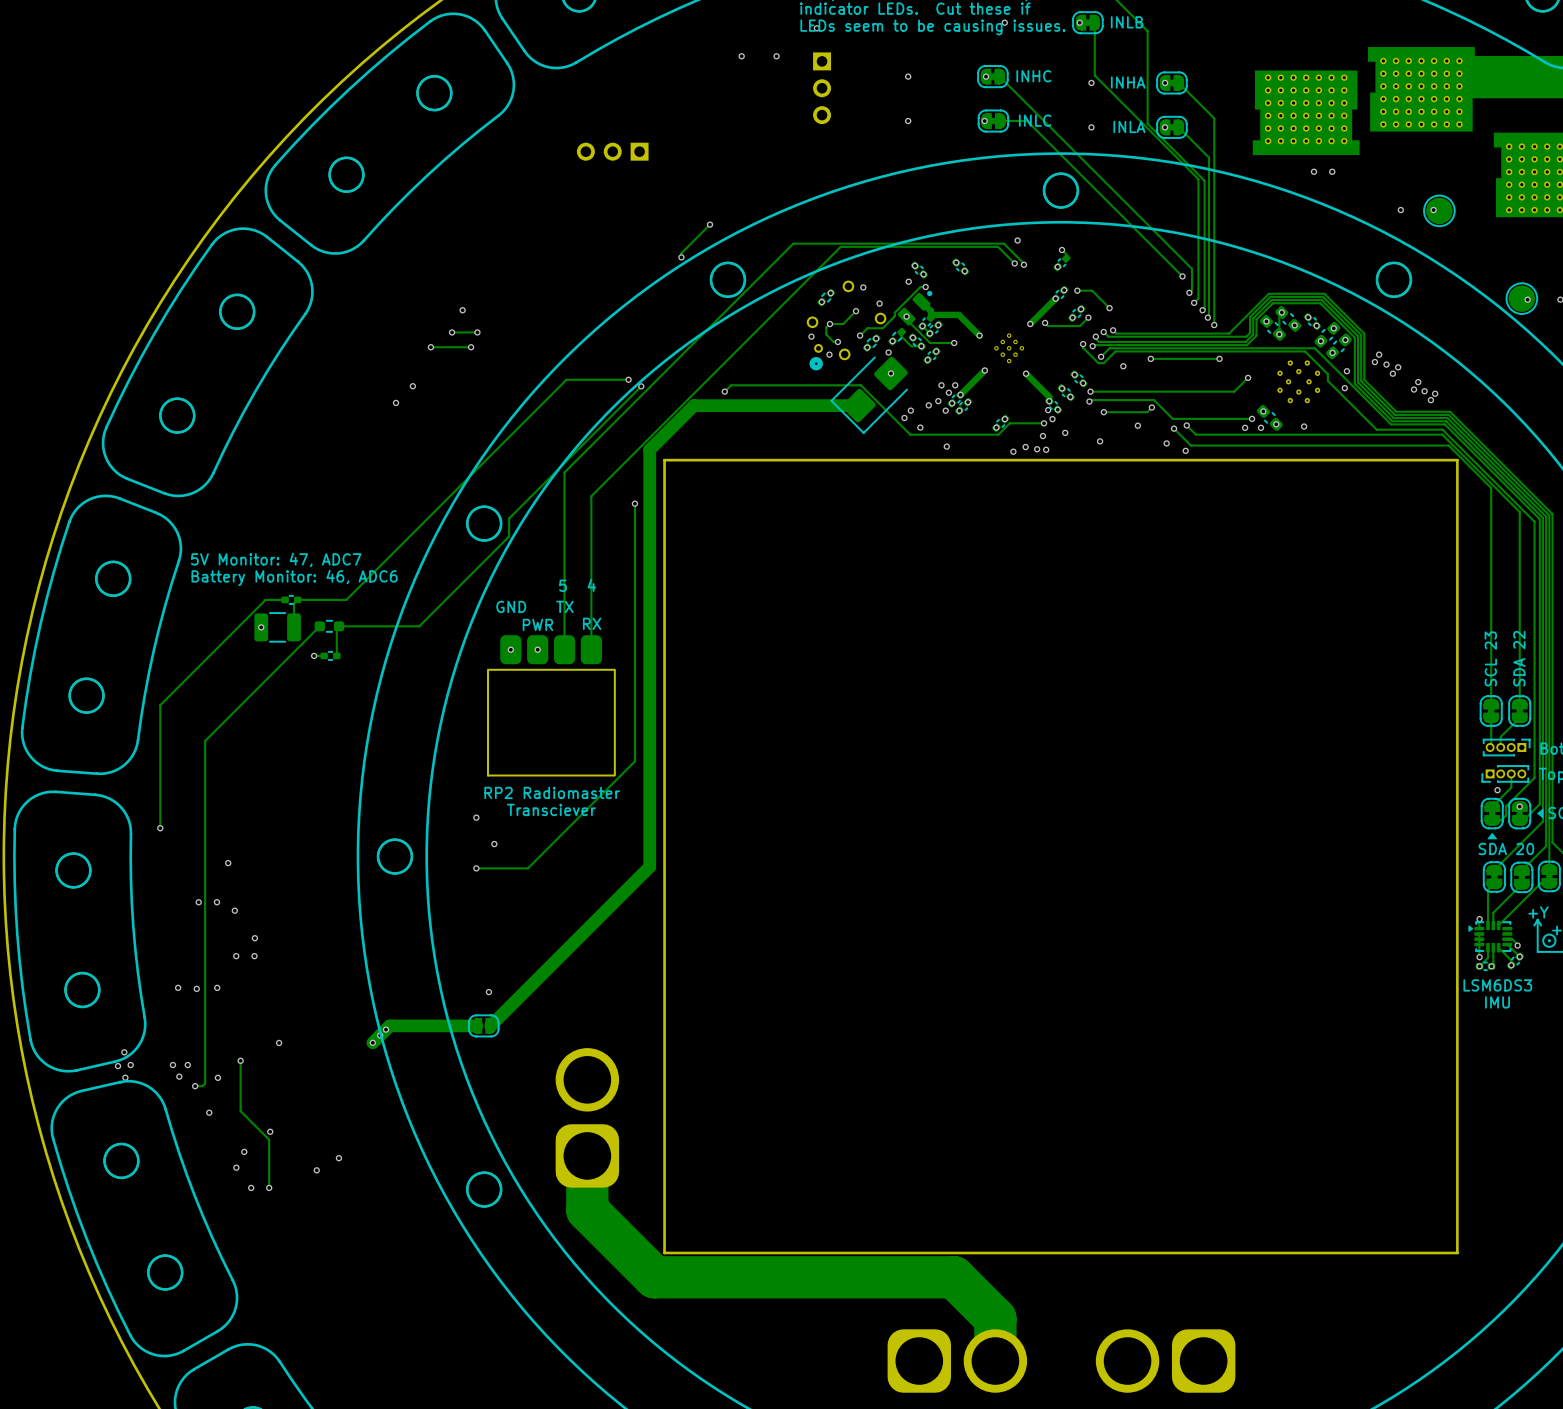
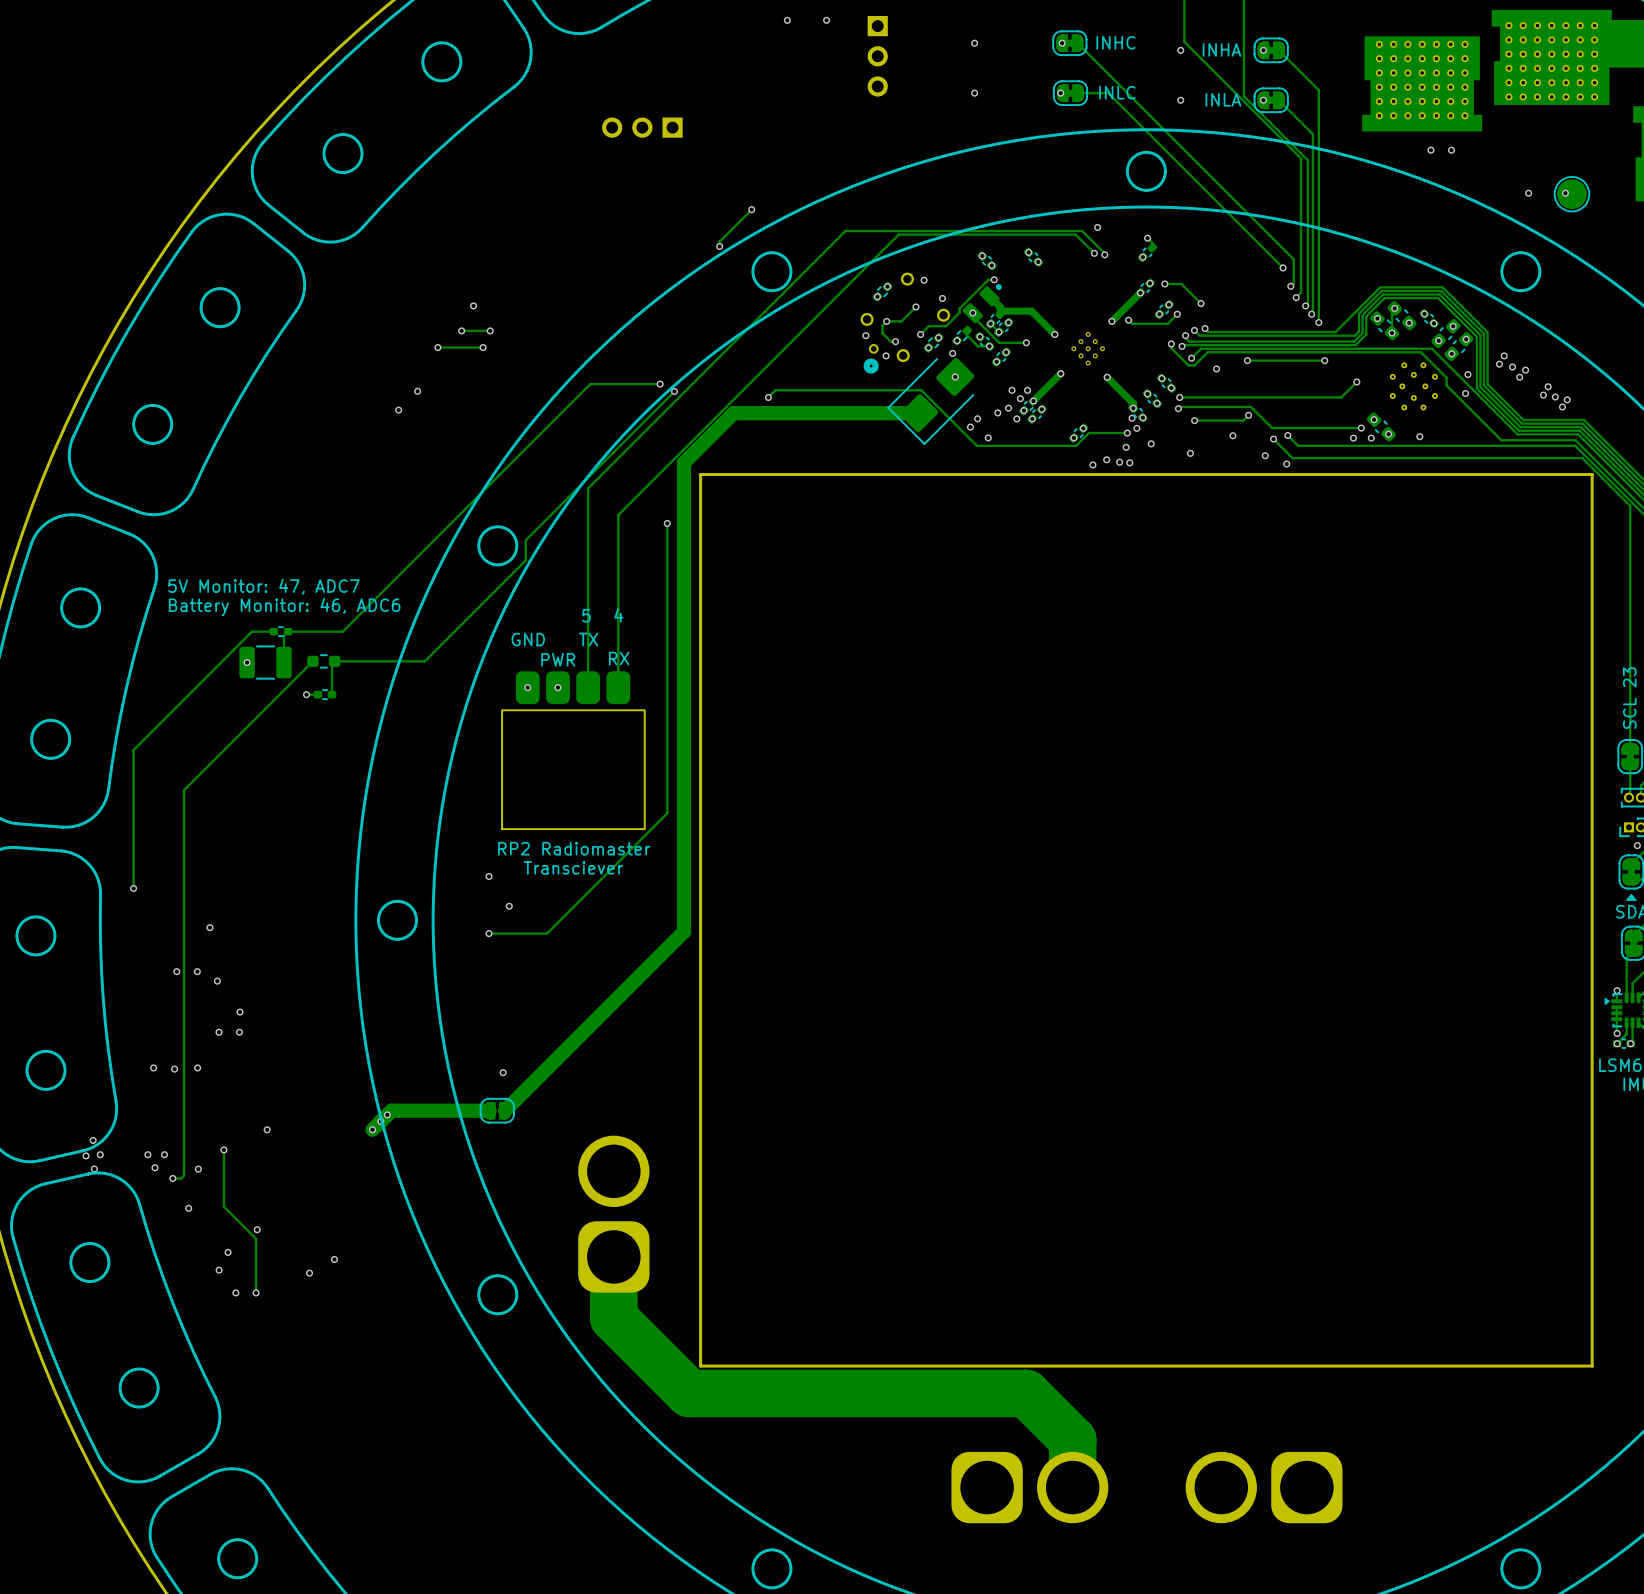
via: (908, 281) -> none
via: (946, 446) -> none

